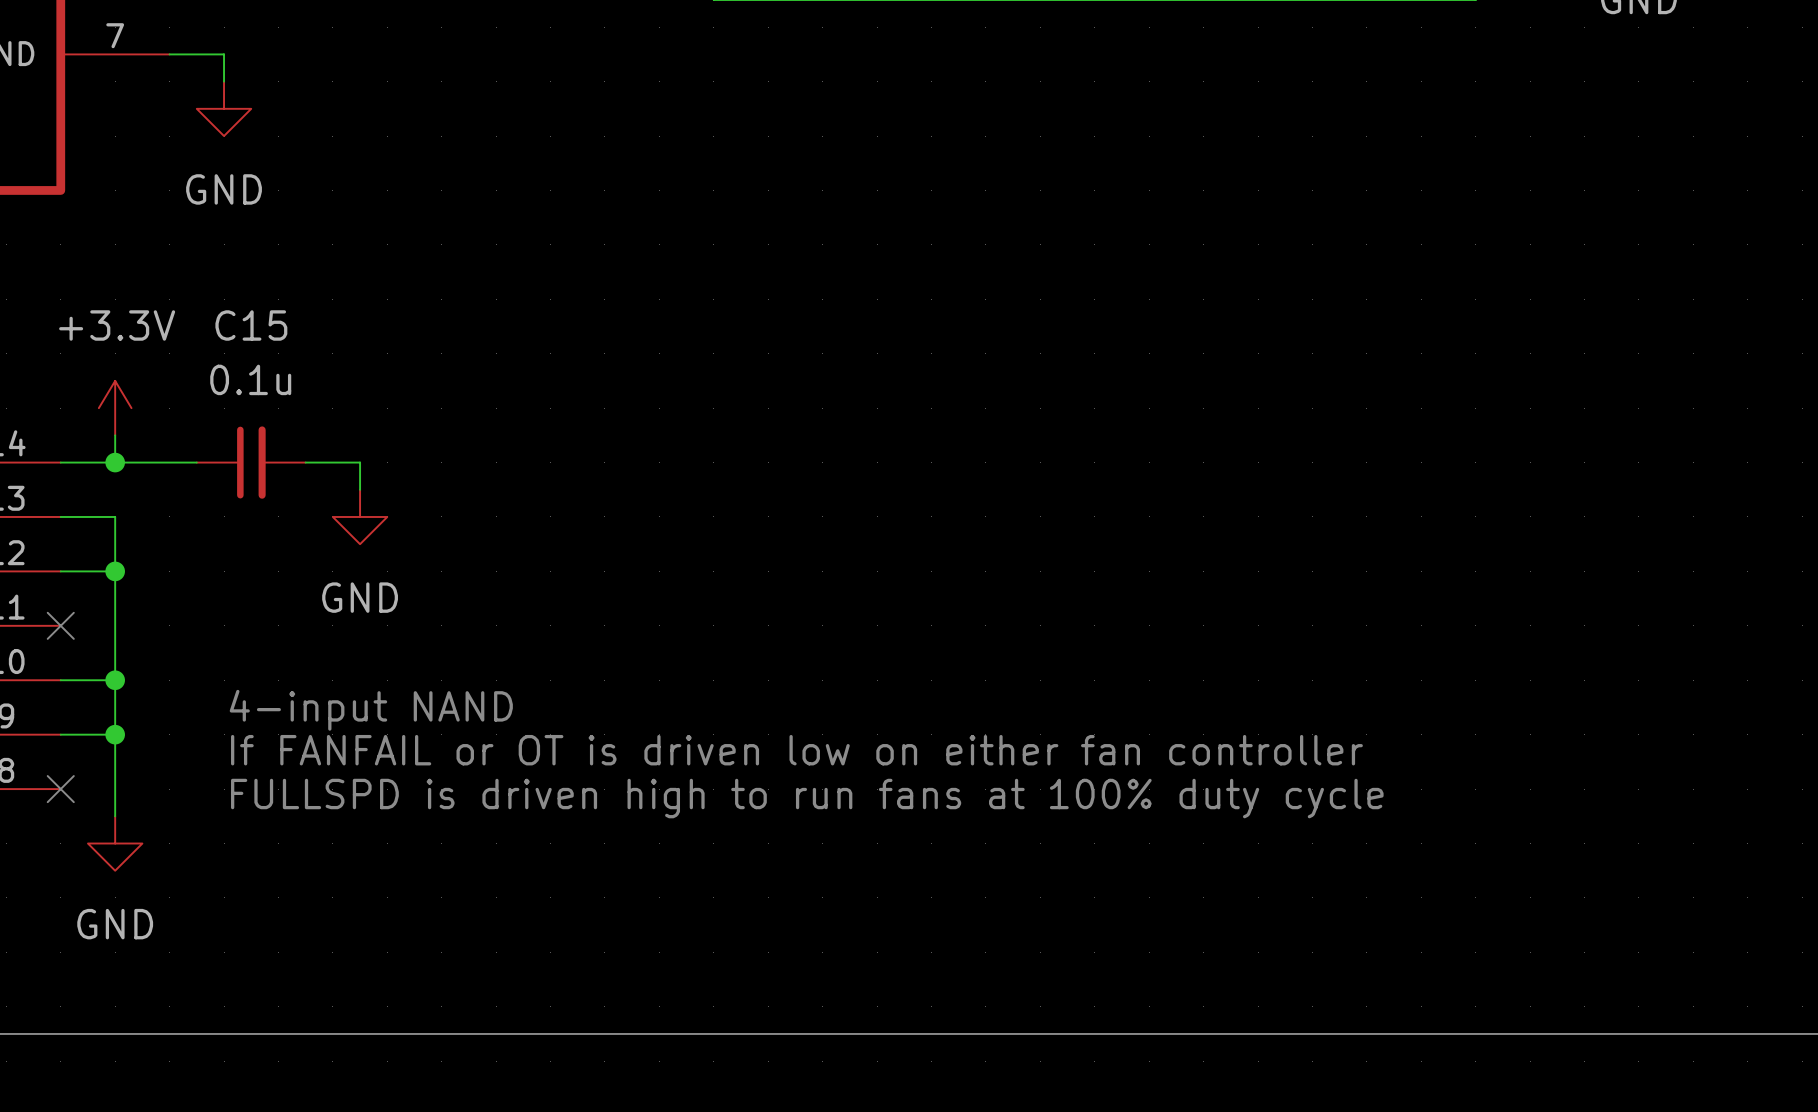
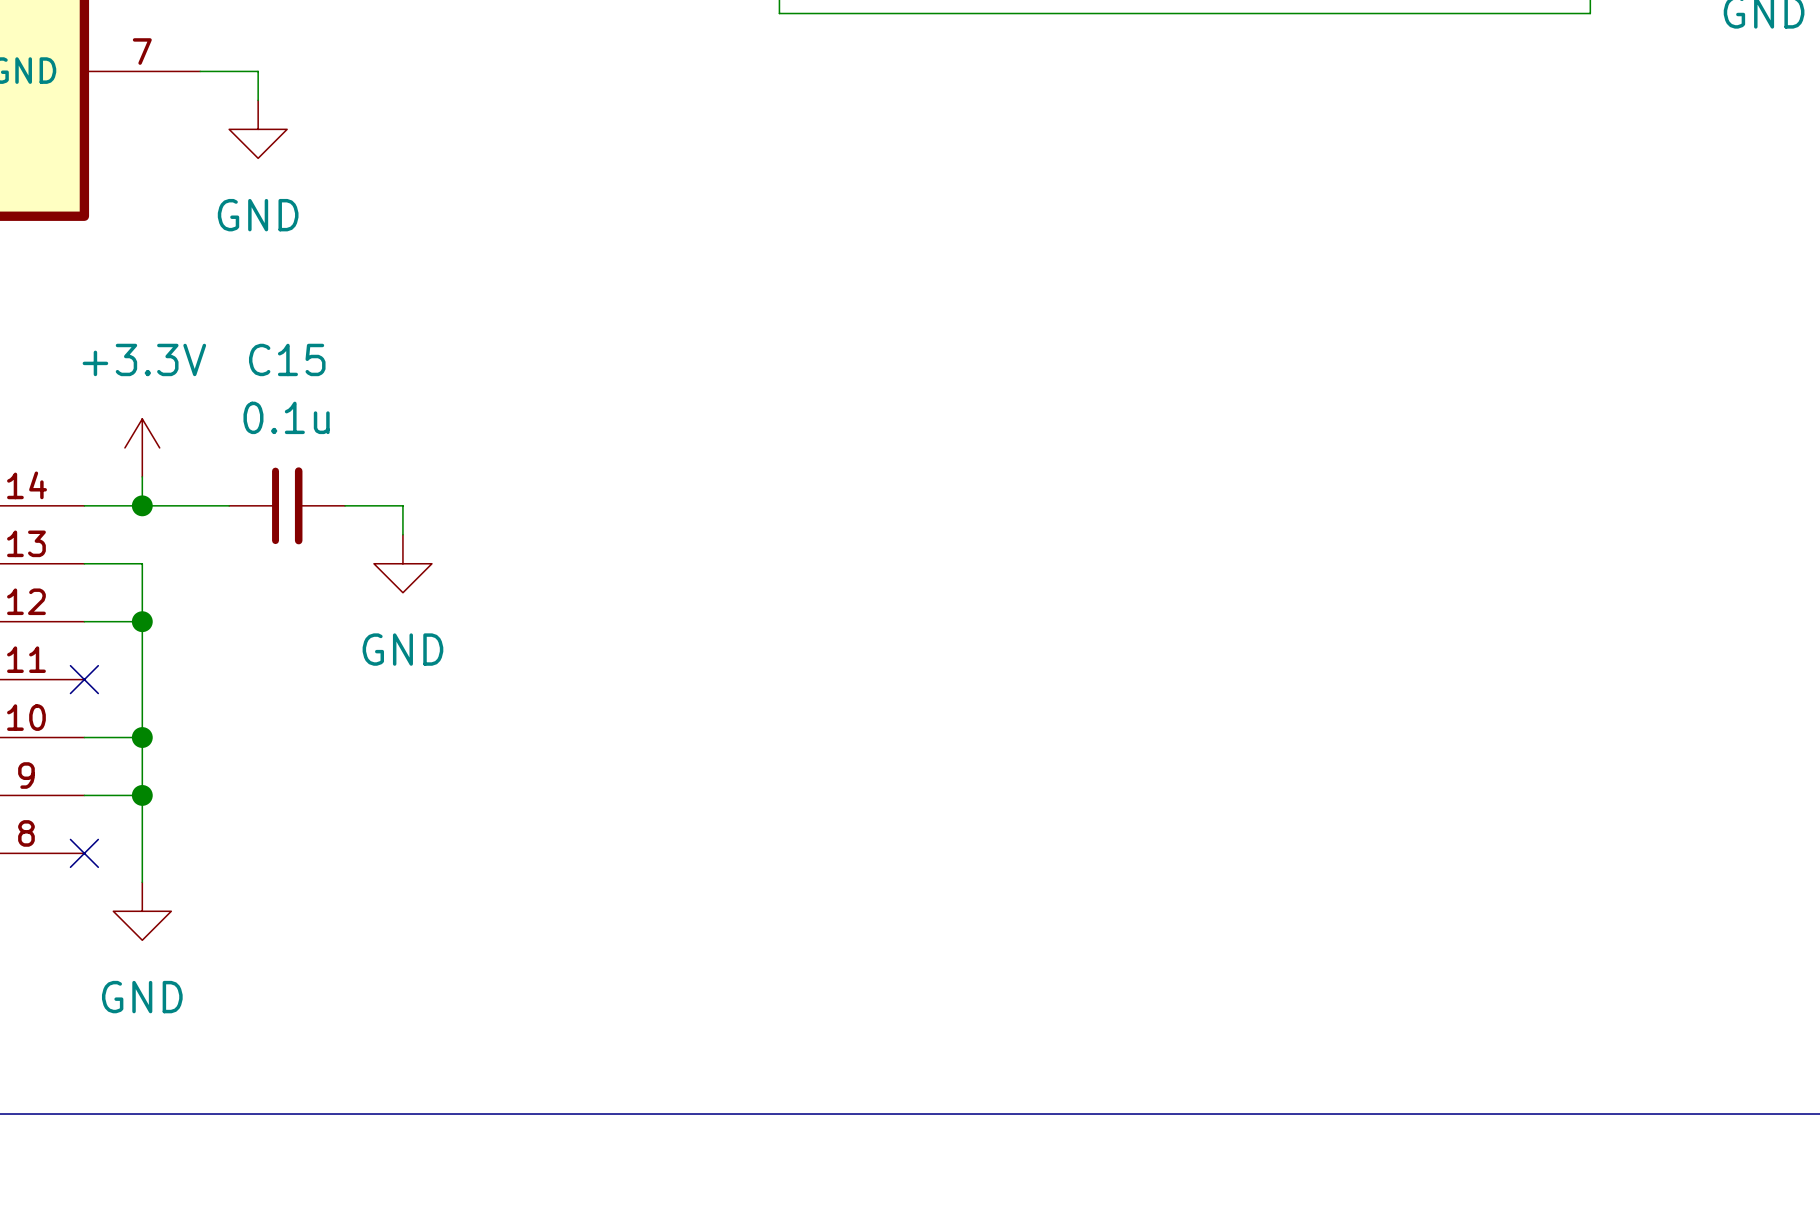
text: 4-input NAND (371, 710) -> none
text: If FANFAIL or OT is driven low on either fan controller (796, 750) -> none
text: FULLSPD is driven high to run fans at 100% duty cycle (807, 798) -> none

